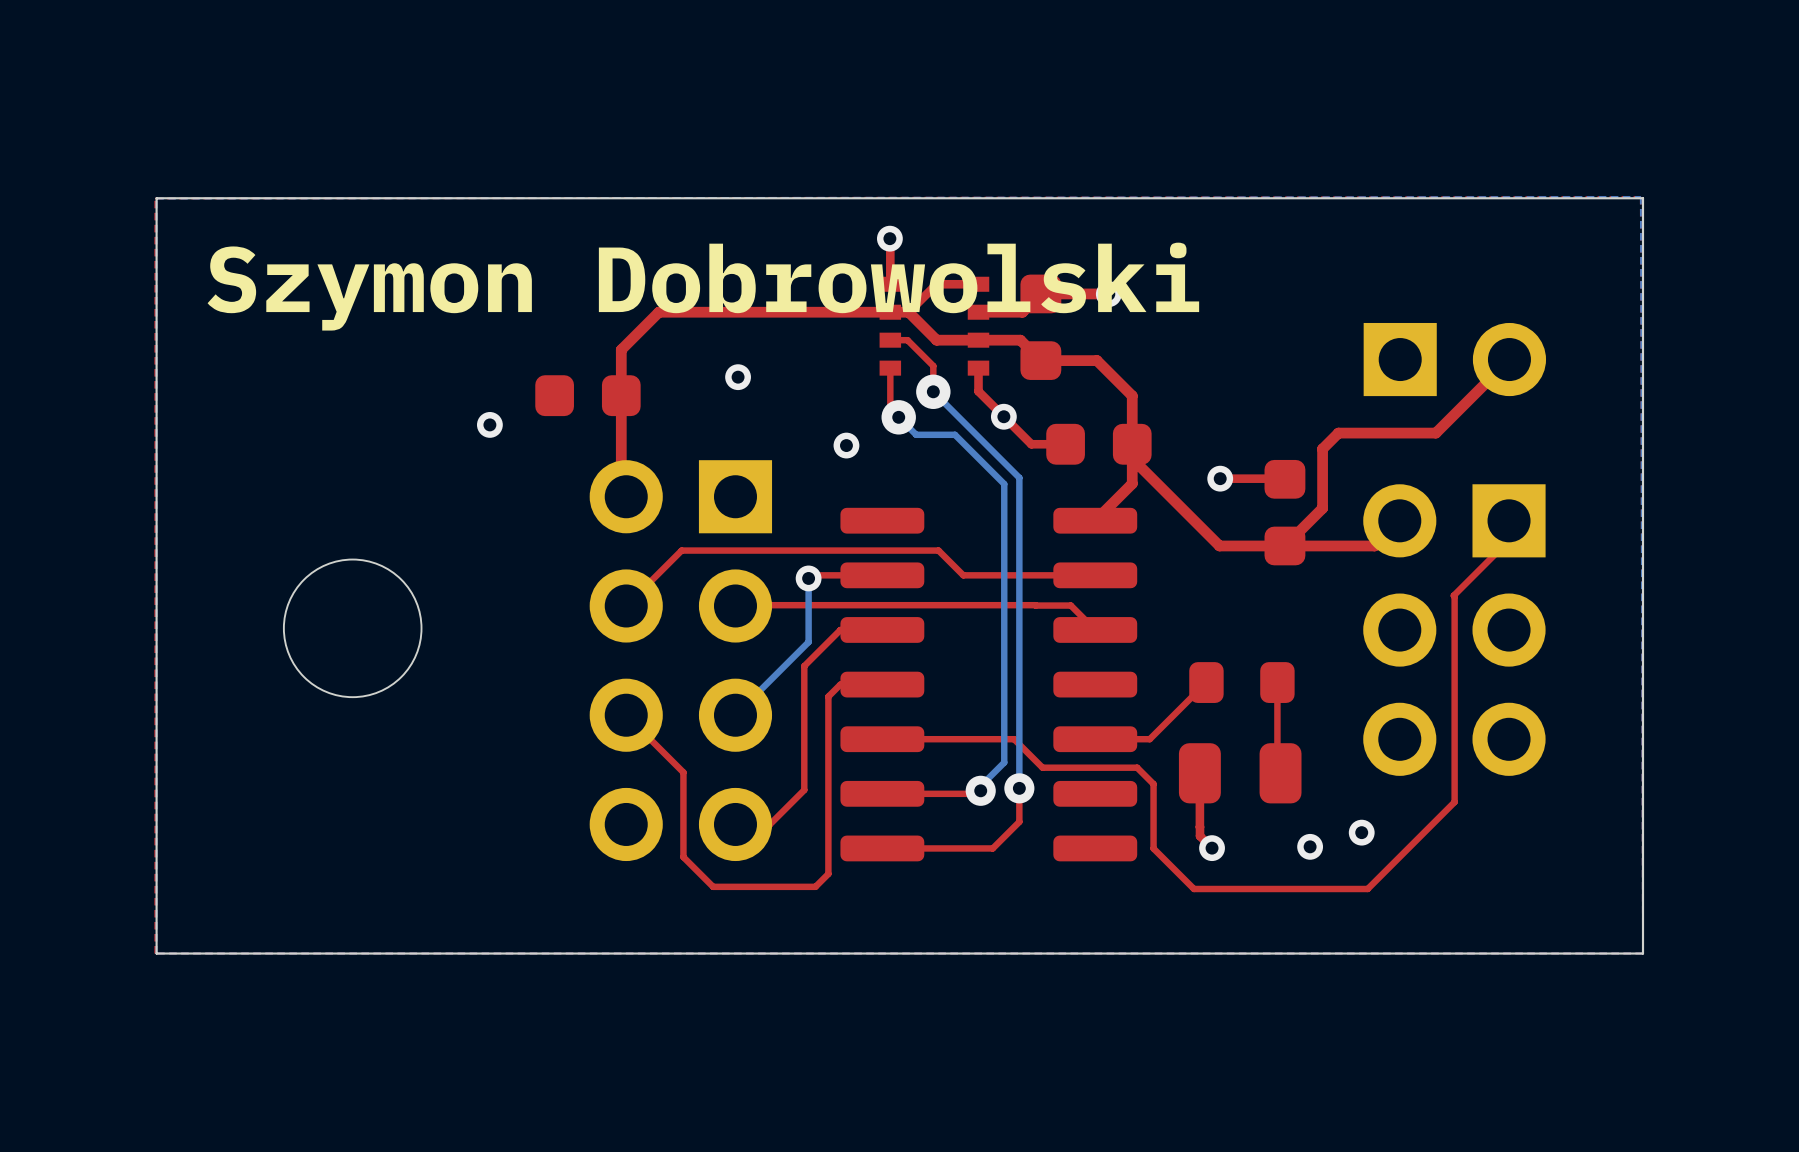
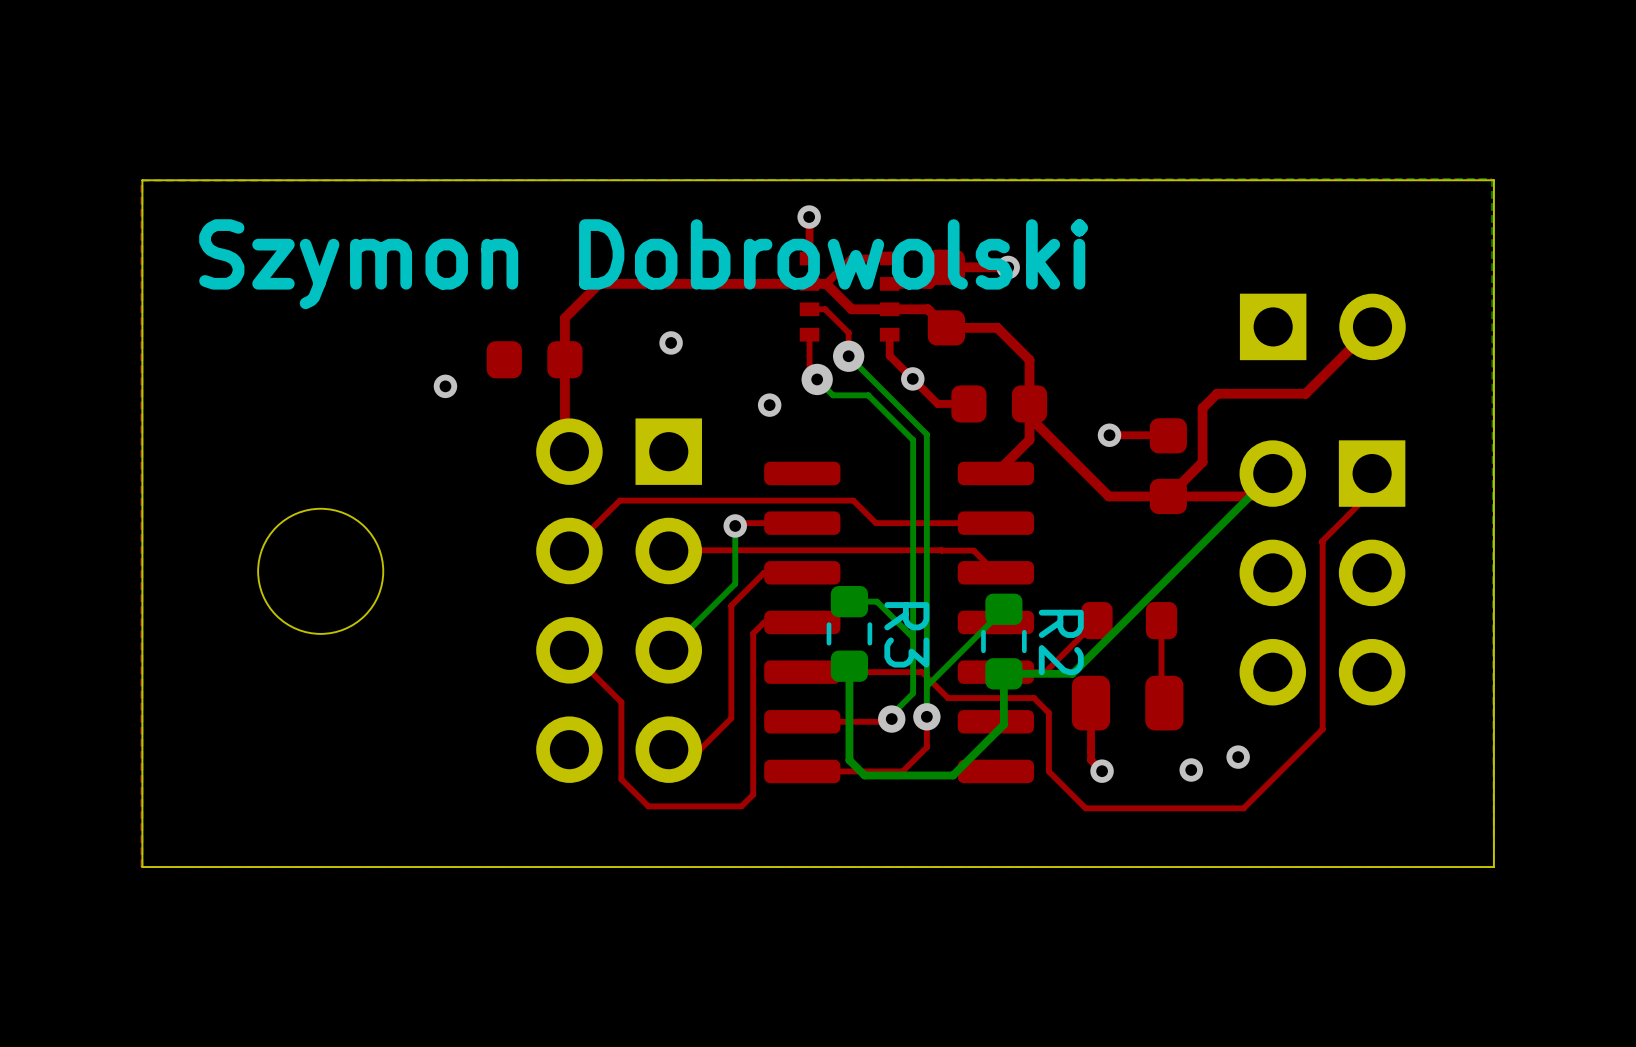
bottom track: none -> (1272, 473) (1072, 673) (1003, 673) (1003, 724) (953, 775) (864, 775) (849, 760) (849, 666)
bottom track: none -> (849, 601) (876, 601) (913, 637)
bottom track: none -> (1003, 609) (926, 686)
R3: none -> (849, 633)
R2: none -> (1003, 641)

